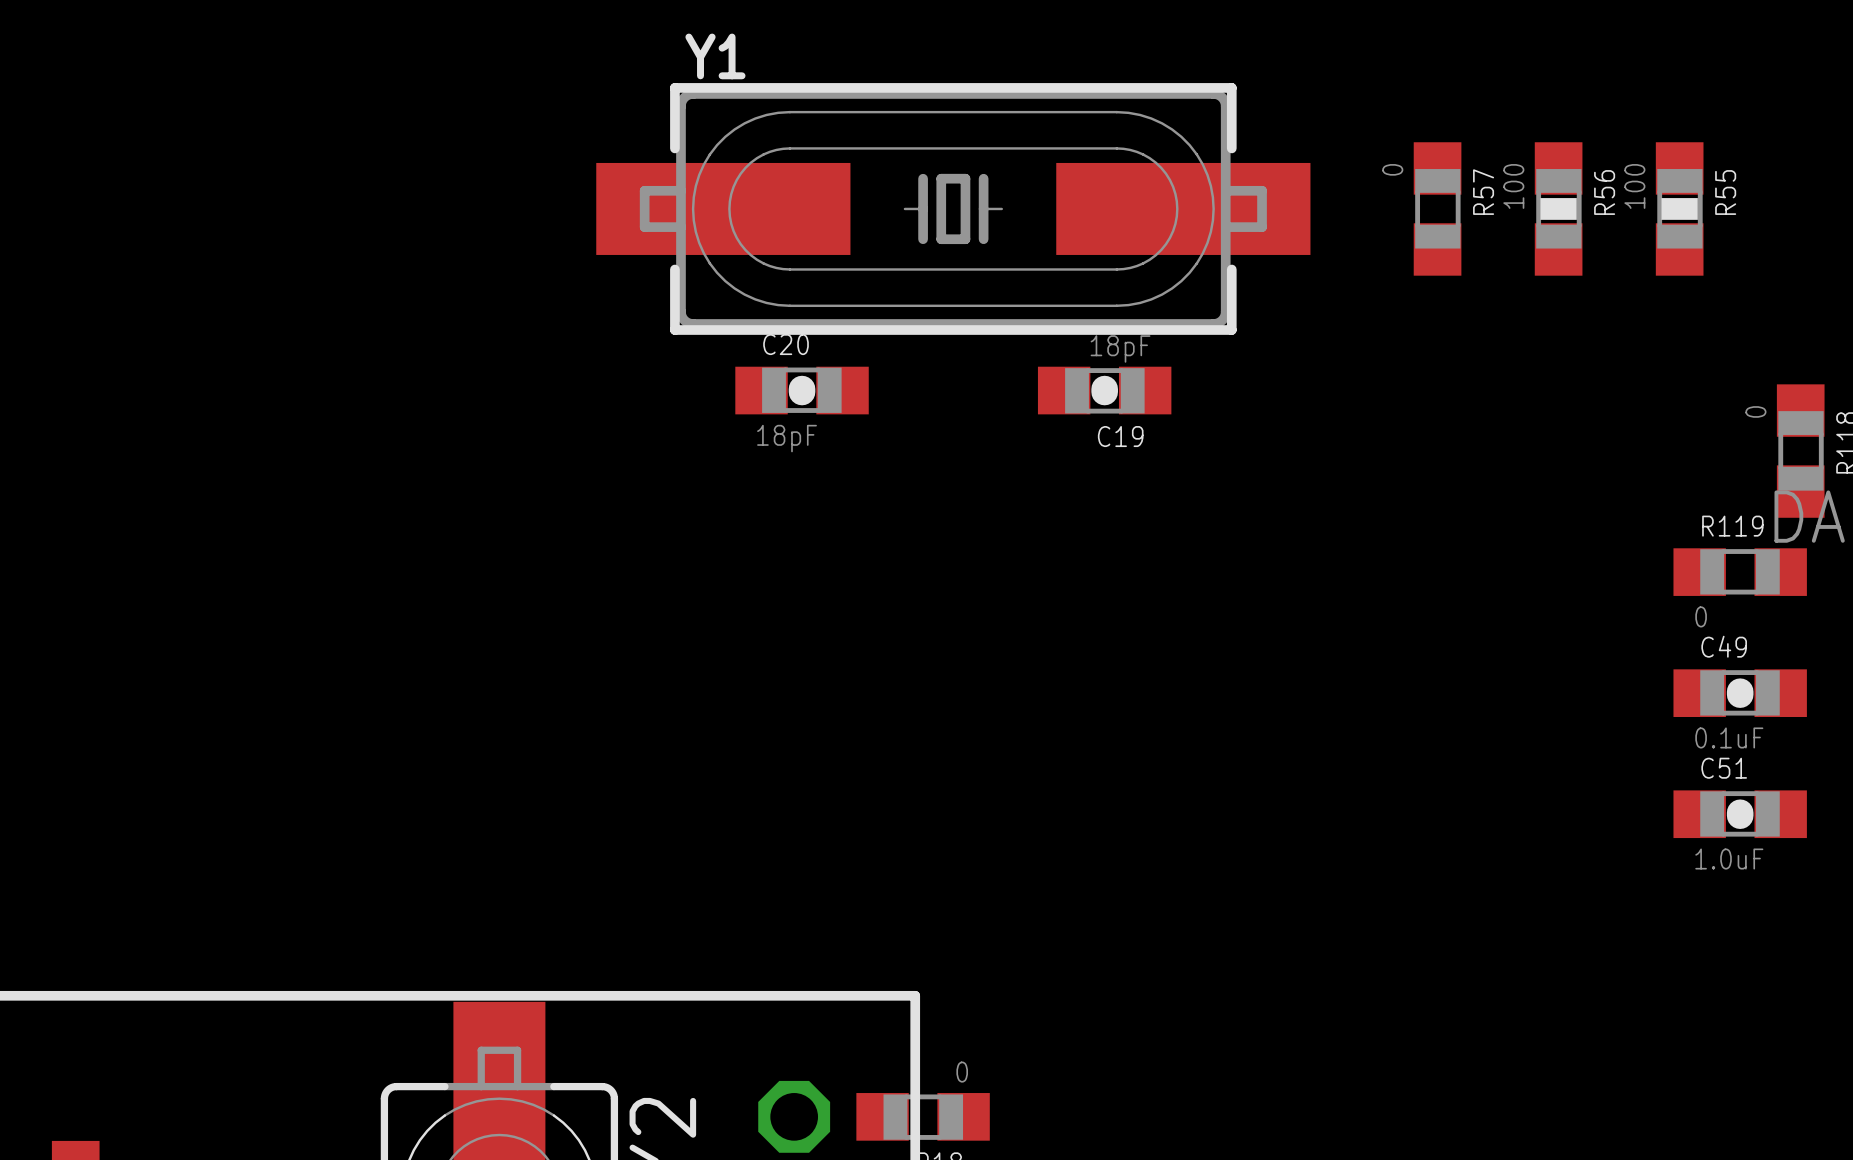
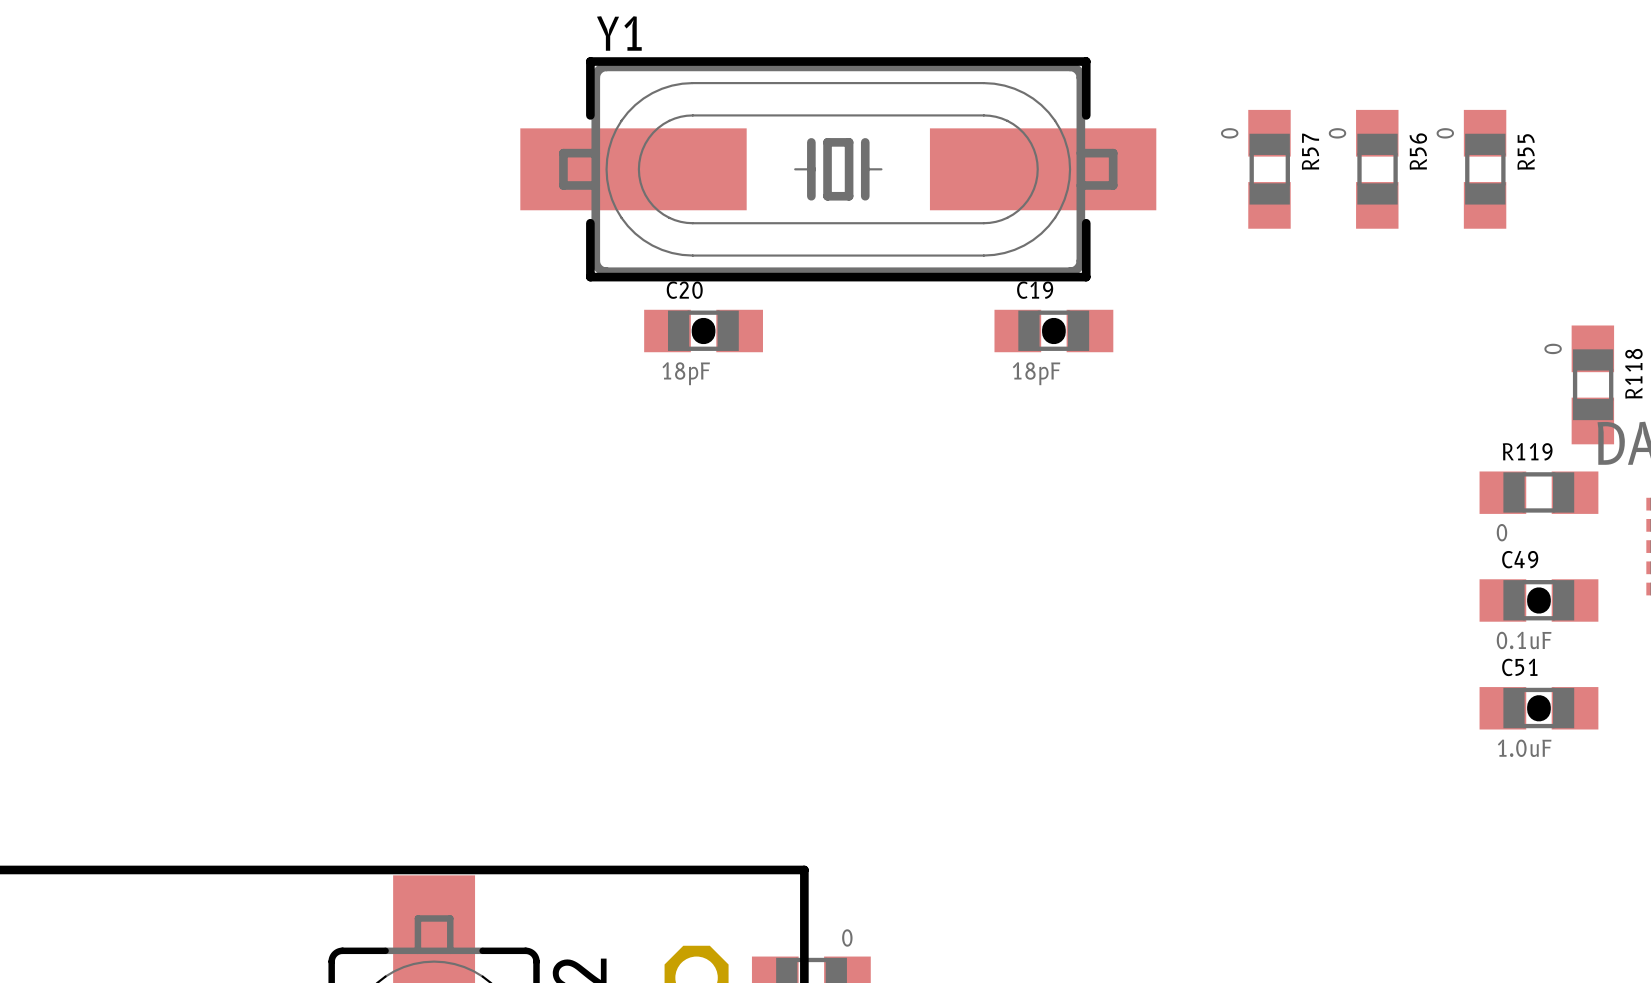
R56 footprint: [1534, 142, 1583, 276] -> [1356, 109, 1399, 229]
R55 footprint: [1655, 142, 1704, 276] -> [1463, 109, 1507, 229]
R56 value: 100 (1513, 186) -> 0 (1337, 133)
R55 value: 100 (1634, 186) -> 0 (1445, 133)
C19 value position: 18pF (1120, 348) -> 18pF (1036, 373)
C19 position: (1104, 390) -> (1053, 331)
C19 name position: C19 (1120, 436) -> C19 (1035, 290)

